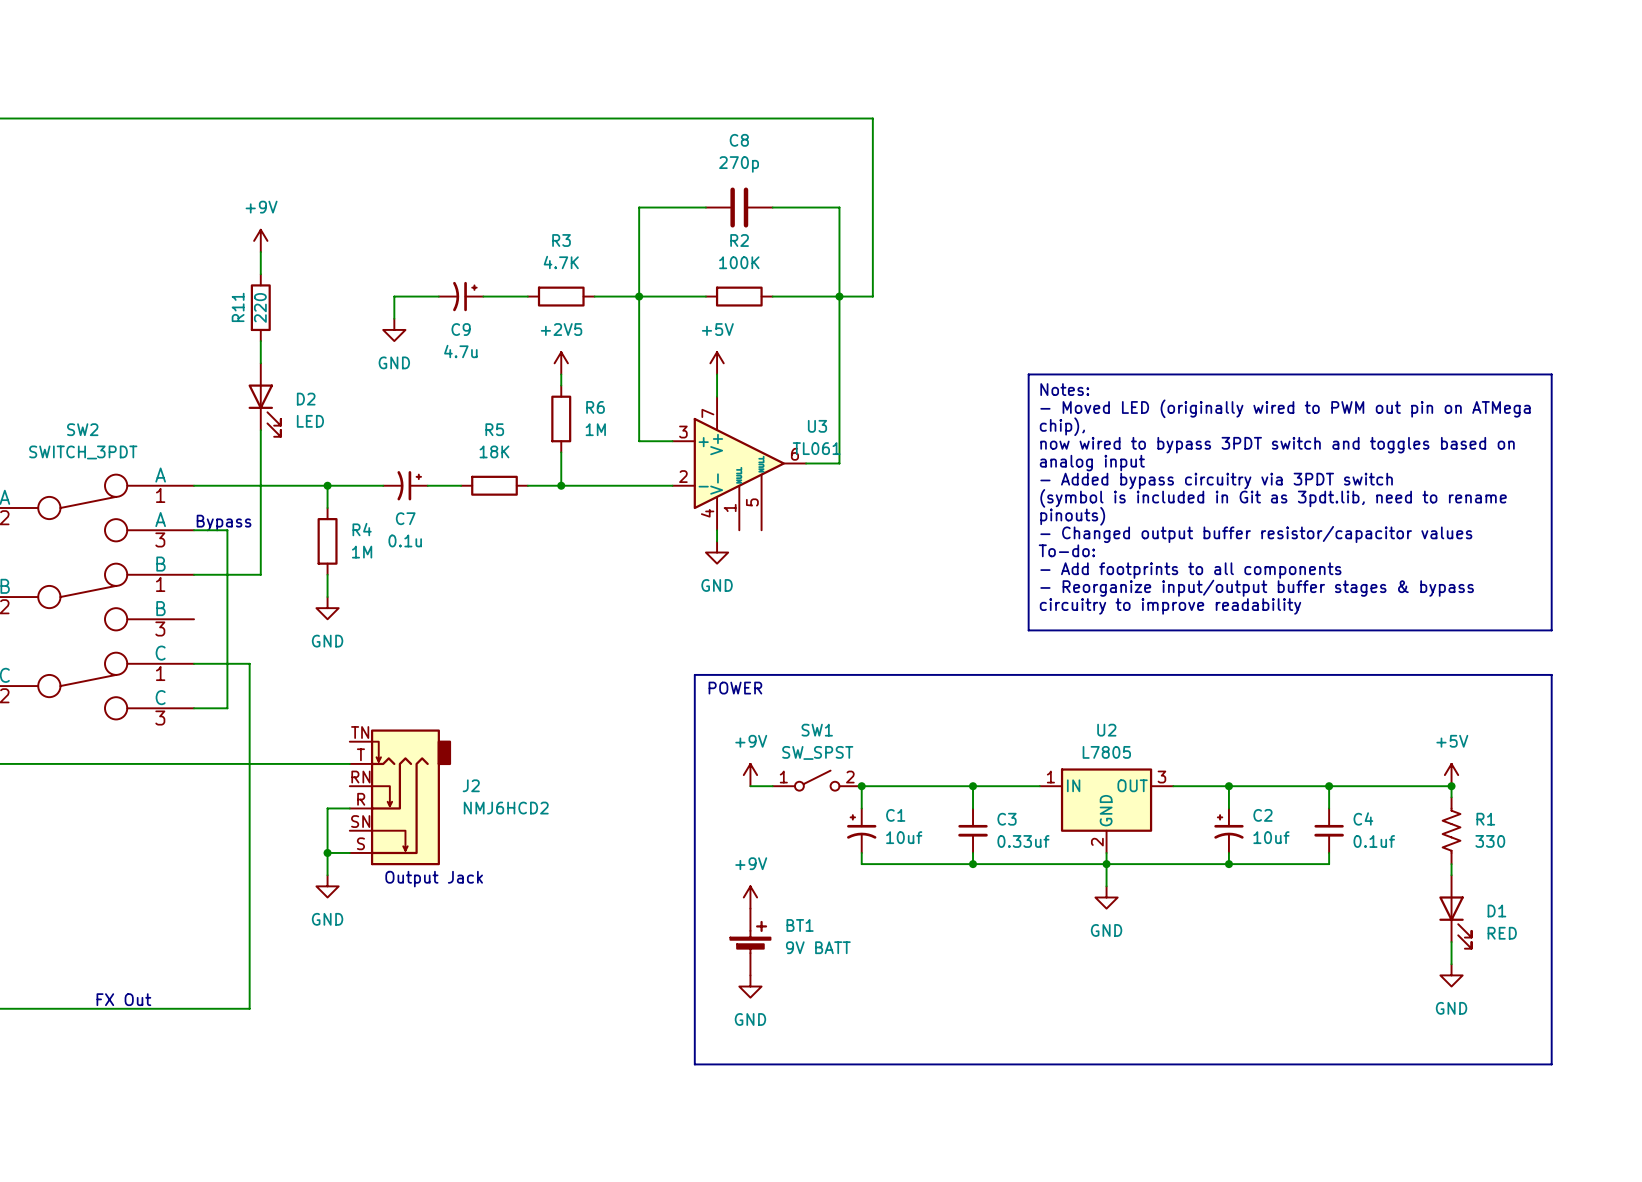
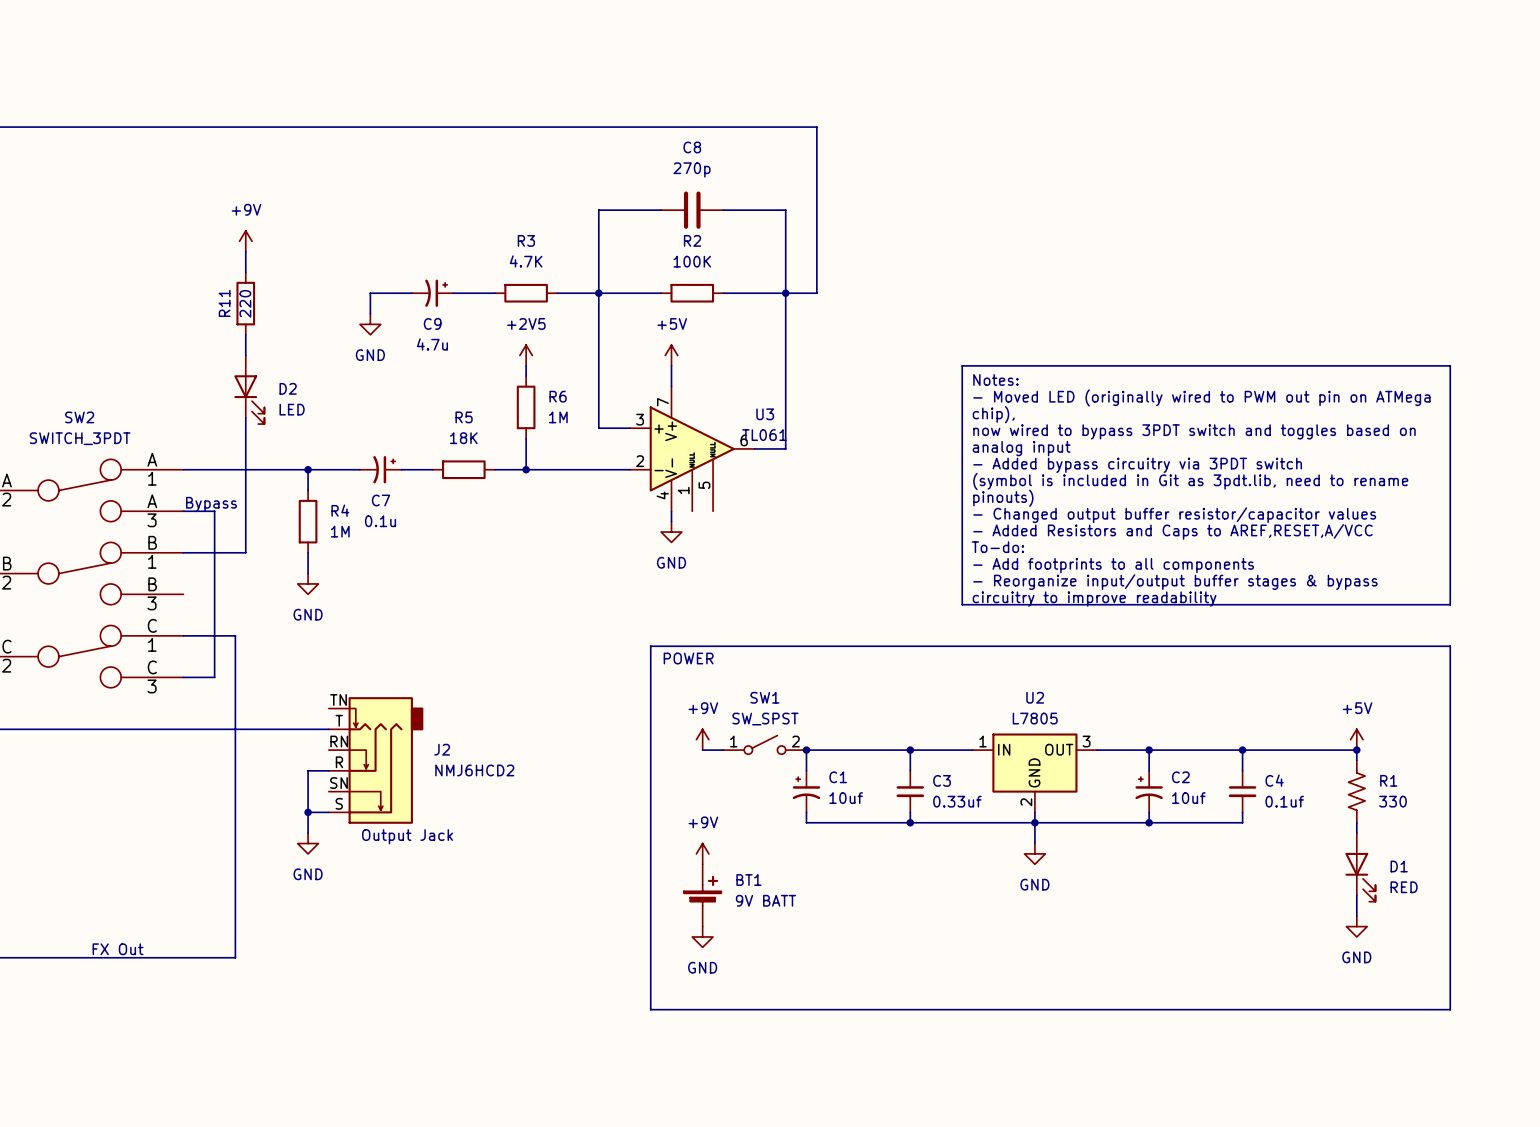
text: To-do: (1066, 550) -> - Added Resistors and Caps to AREF,RESET,A/VCC (1172, 531)
text: - Add footprints to all components (1190, 570) -> To-do: (997, 547)
text: - Reorganize input/output buffer stages & bypass (1257, 588) -> - Add footprints to all components (1113, 565)
text: circuitry to improve readability (1170, 606) -> - Reorganize input/output buffer stages & bypass (1175, 582)
text: none -> circuitry to improve readability (1094, 599)

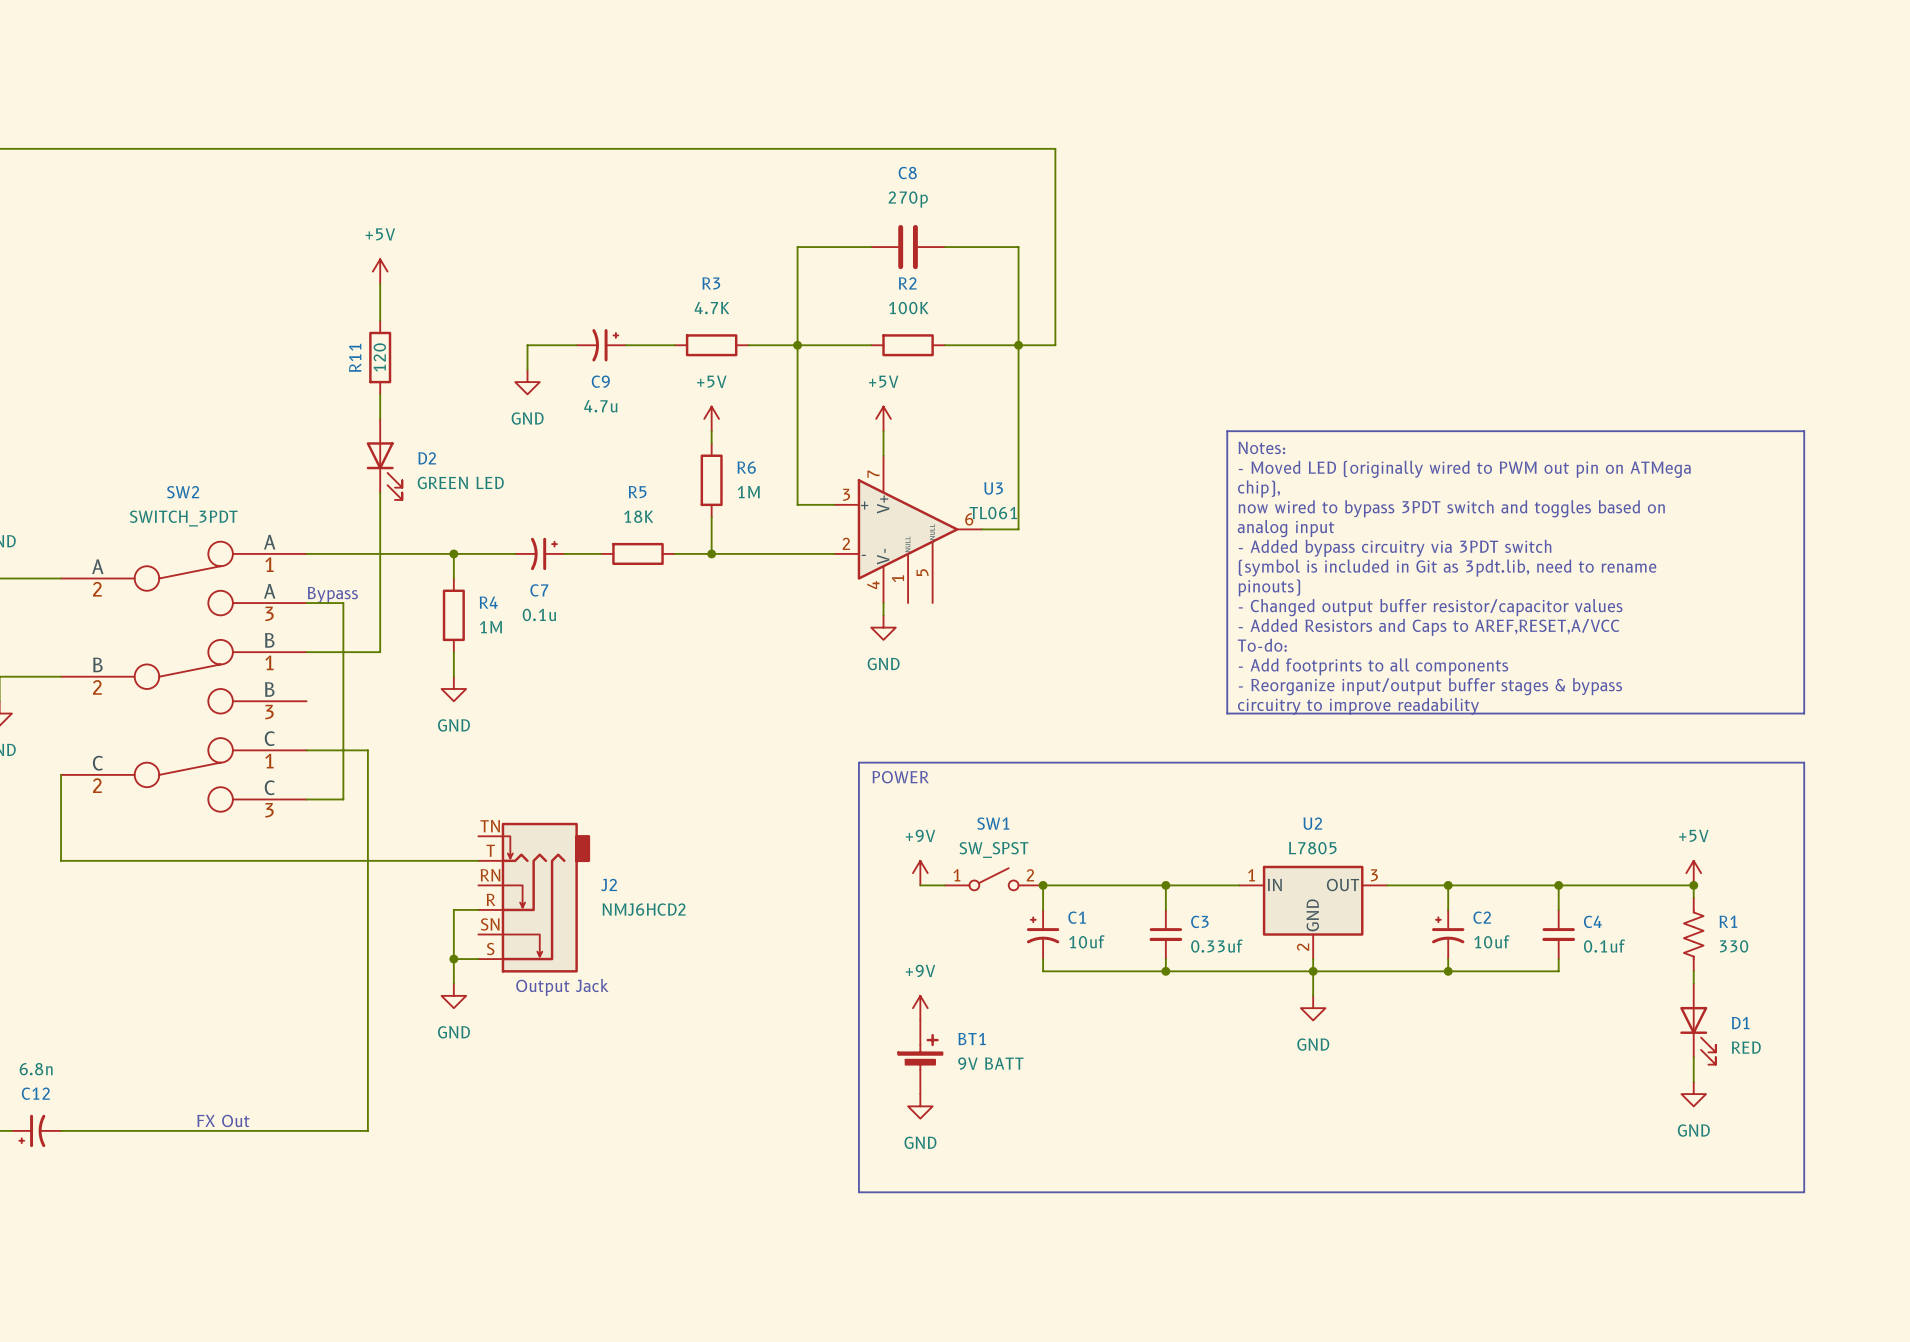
power symbol: none -> +5V (380, 271)
power symbol: +9V (245, 241) -> none
R11 value: 220 (245, 303) -> 120 (379, 357)
power symbol: +2V5 (526, 355) -> +5V (711, 418)
D2 value: LED (292, 409) -> GREEN LED (460, 482)

